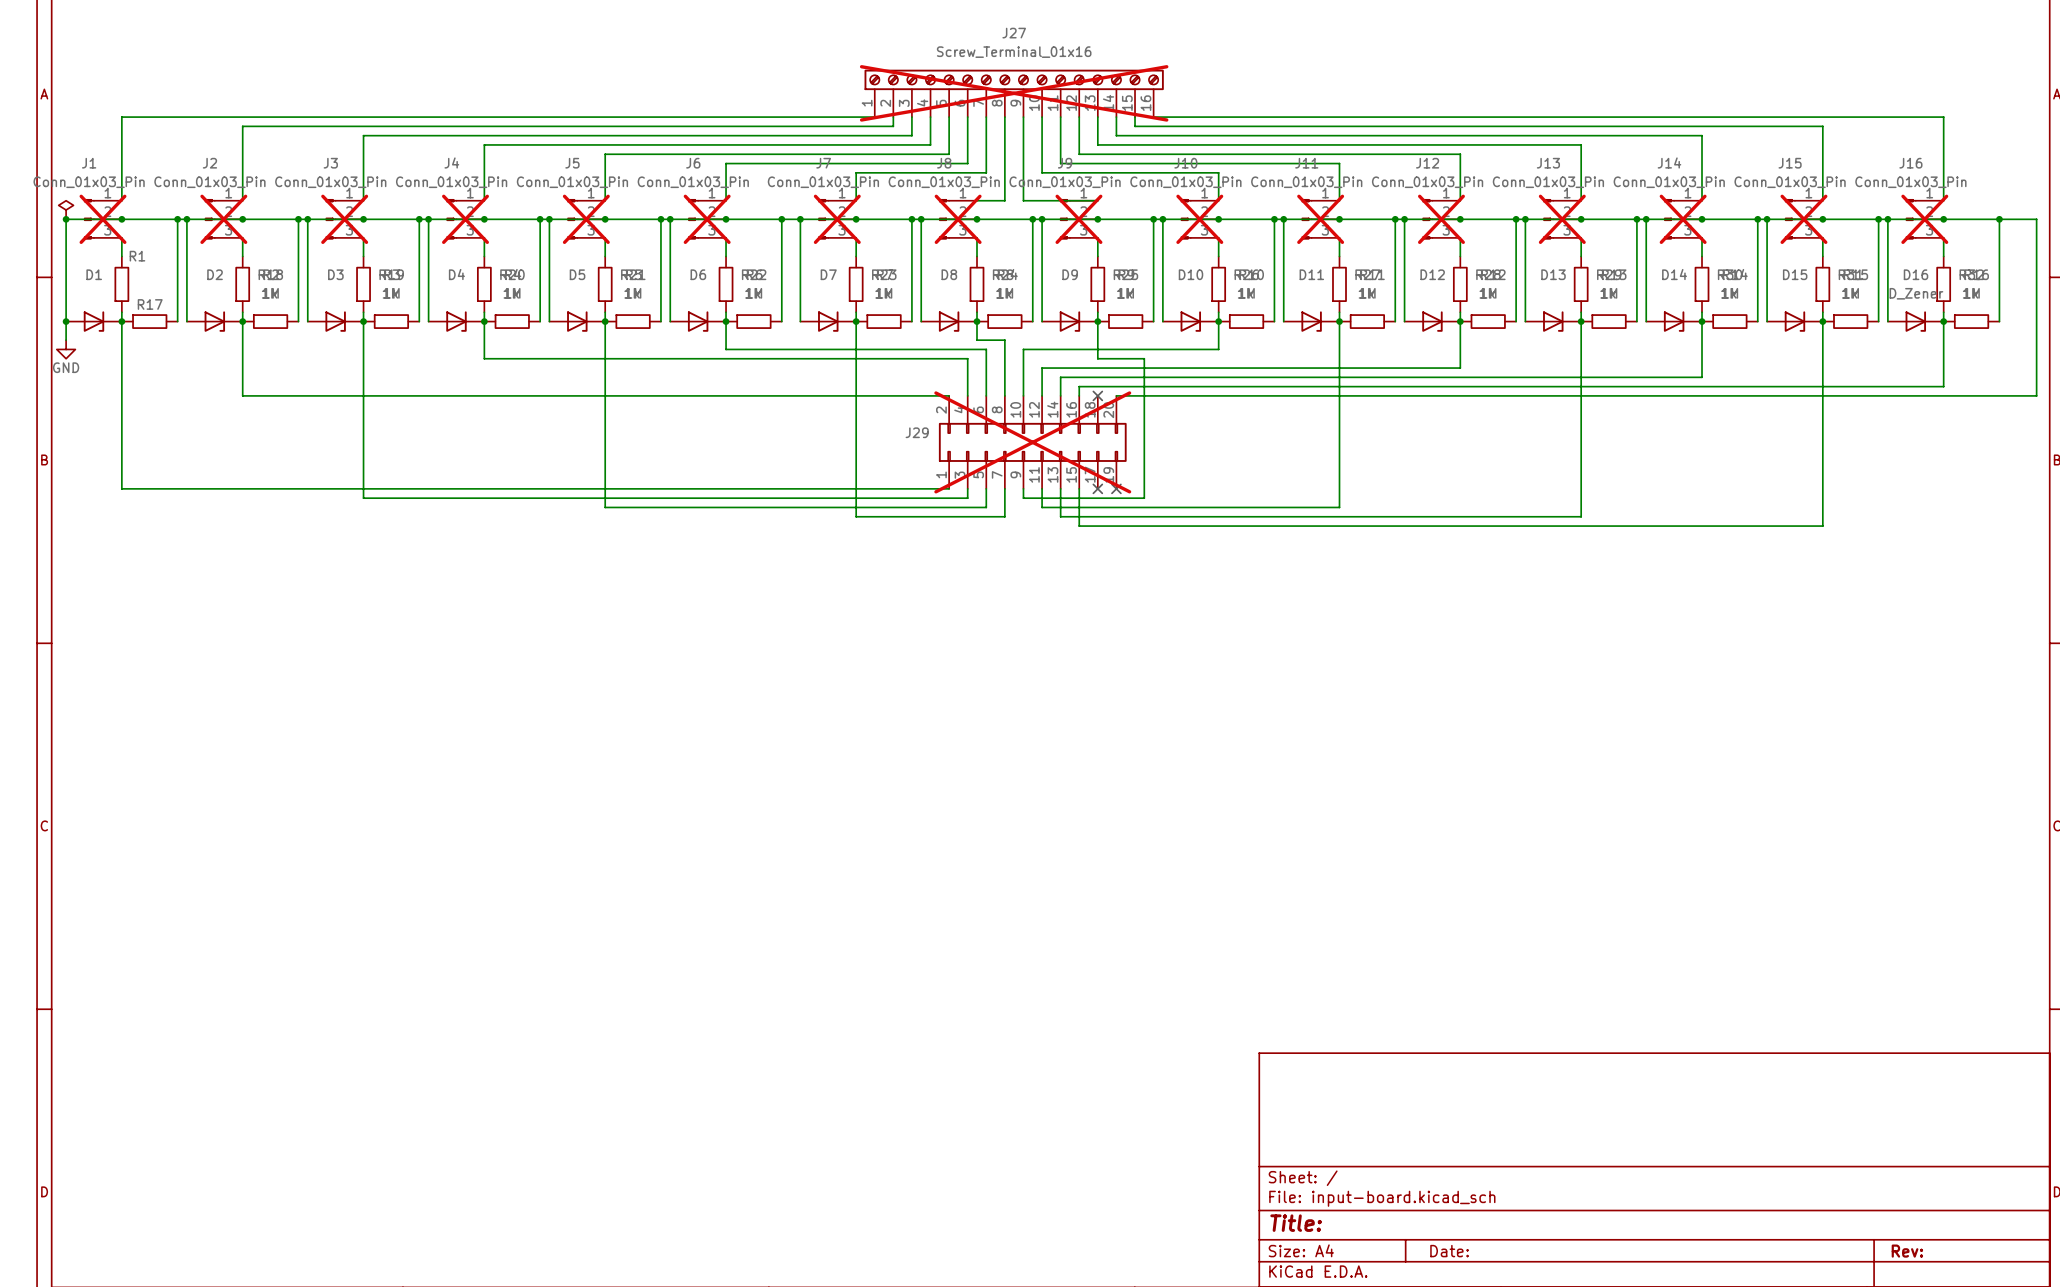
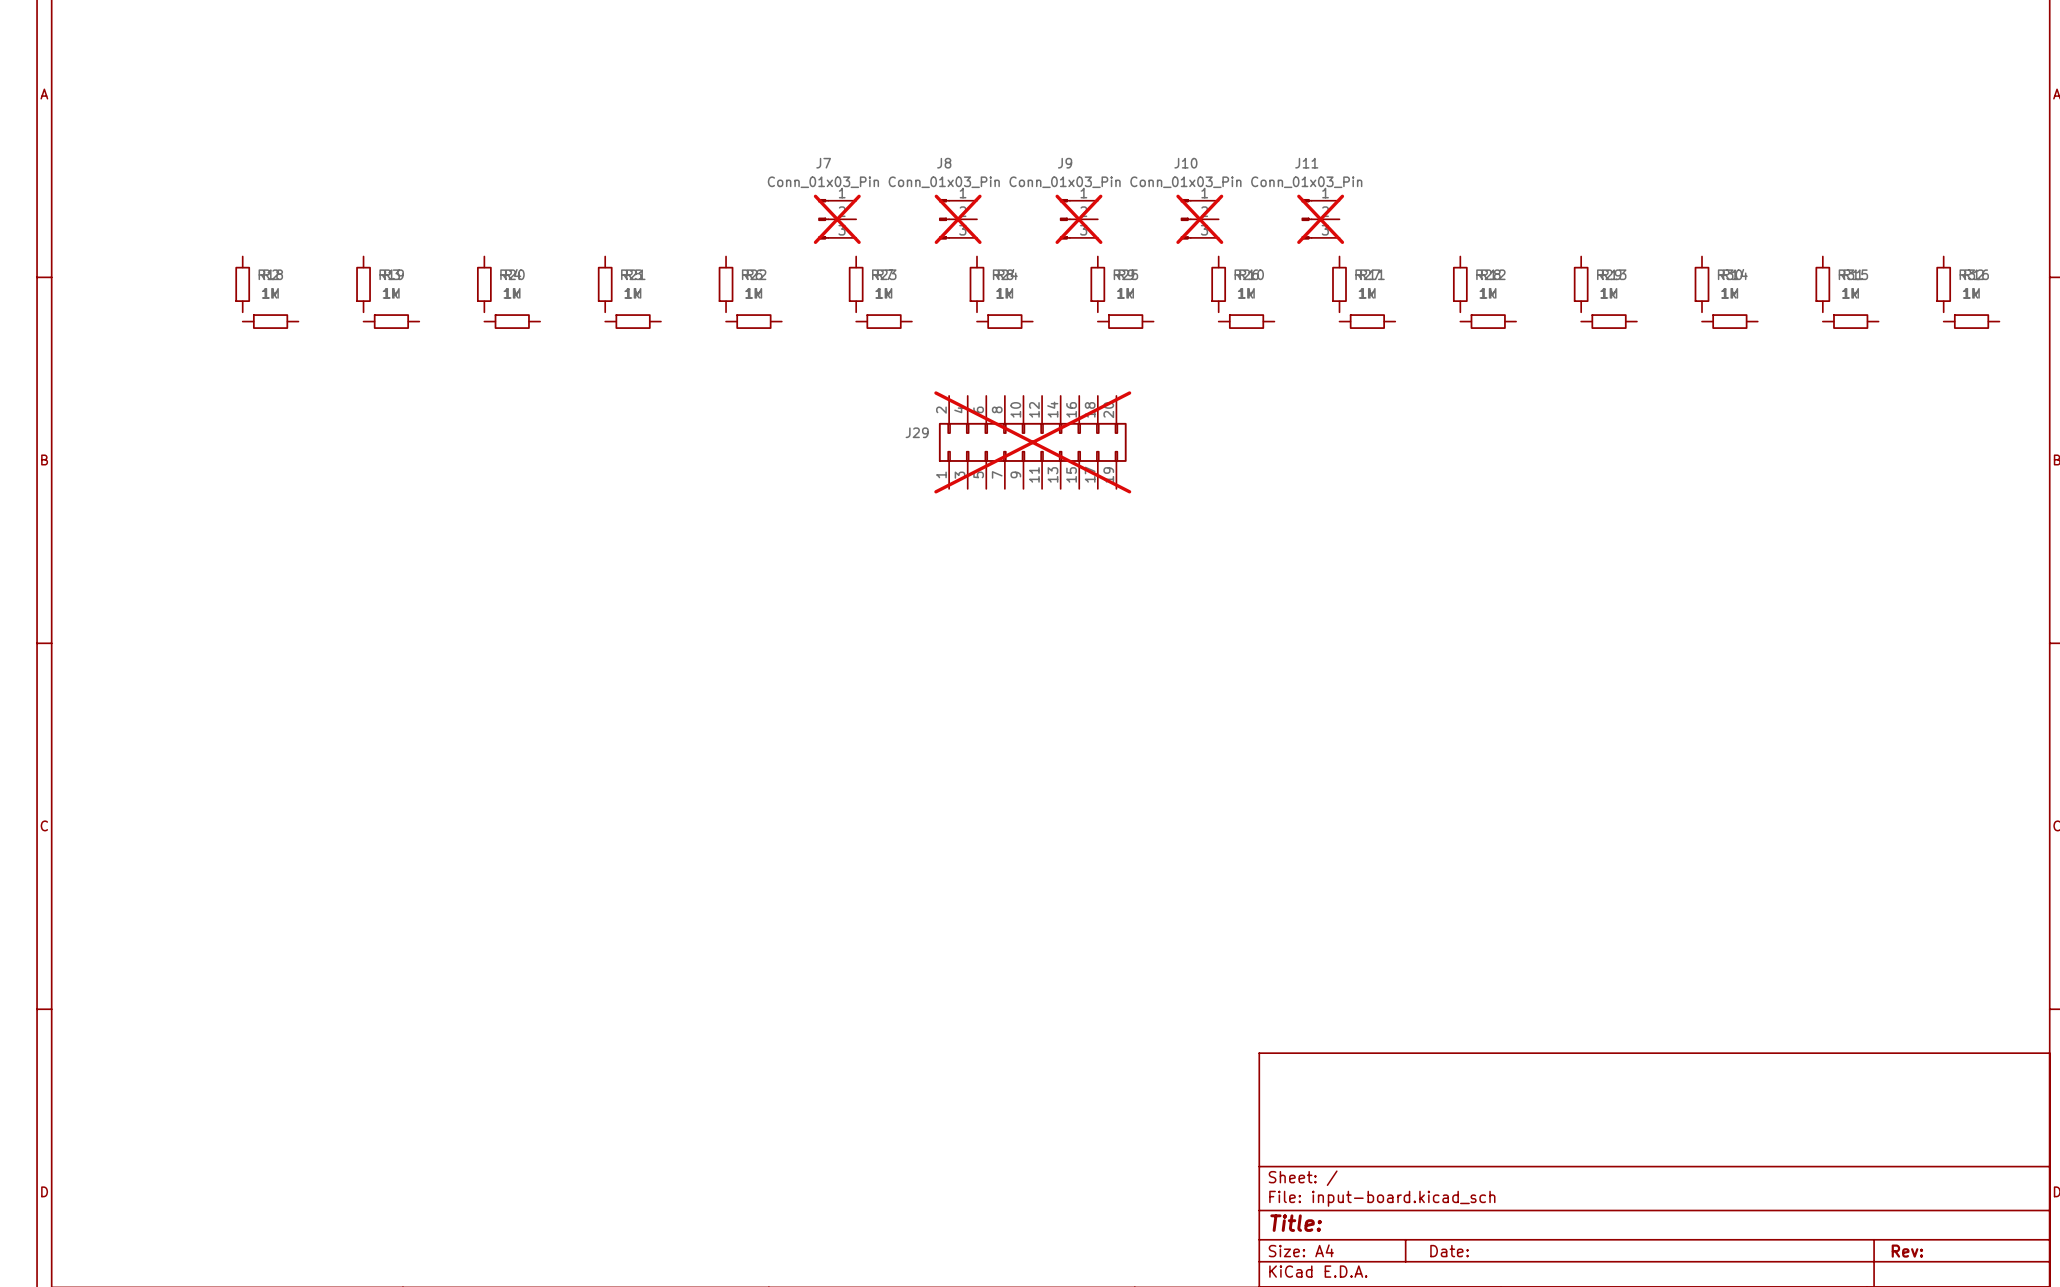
J27: Screw_Terminal_01x16 (1014, 93) -> none
wire: (874, 117) (121, 117) (121, 200) -> none
wire: (893, 117) (893, 126) (242, 126) (242, 200) -> none
wire: (911, 117) (911, 135) (363, 135) (363, 200) -> none
wire: (930, 117) (930, 144) (484, 144) (484, 200) -> none
wire: (949, 117) (949, 154) (605, 154) (605, 200) -> none
wire: (967, 117) (967, 163) (726, 163) (726, 200) -> none
wire: (986, 117) (986, 172) (856, 172) (856, 200) -> none
wire: (1004, 117) (1004, 200) (977, 200) -> none
wire: (1023, 117) (1023, 200) (1097, 200) -> none
wire: (1042, 117) (1042, 172) (1218, 172) (1218, 200) -> none
wire: (1060, 117) (1060, 163) (1339, 163) (1339, 200) -> none
wire: (1079, 117) (1079, 154) (1460, 154) (1460, 200) -> none
wire: (1097, 117) (1097, 144) (1581, 144) (1581, 200) -> none
wire: (1116, 117) (1116, 135) (1702, 135) (1702, 200) -> none
wire: (1135, 117) (1135, 126) (1822, 126) (1822, 200) -> none
wire: (1153, 117) (1943, 117) (1943, 200) -> none
power symbol: (66, 210) -> none
junction: (66, 219) -> none
J1: Conn_01x03_Pin (102, 219) -> none
junction: (121, 219) -> none
wire: (177, 219) (177, 321) -> none
junction: (177, 219) -> none
wire: (186, 219) (186, 321) -> none
junction: (186, 219) -> none
J2: Conn_01x03_Pin (223, 219) -> none
junction: (242, 219) -> none
wire: (298, 219) (298, 321) -> none
junction: (298, 219) -> none
wire: (307, 219) (307, 321) -> none
junction: (307, 219) -> none
J3: Conn_01x03_Pin (344, 219) -> none
junction: (363, 219) -> none
wire: (419, 219) (419, 321) -> none
junction: (419, 219) -> none
wire: (428, 219) (428, 321) -> none
junction: (428, 219) -> none
J4: Conn_01x03_Pin (465, 219) -> none
junction: (484, 219) -> none
wire: (540, 219) (540, 321) -> none
junction: (540, 219) -> none
wire: (549, 219) (549, 321) -> none
junction: (549, 219) -> none
J5: Conn_01x03_Pin (586, 219) -> none
junction: (605, 219) -> none
wire: (660, 219) (660, 321) -> none
junction: (660, 219) -> none
wire: (670, 219) (670, 321) -> none
junction: (670, 219) -> none
J6: Conn_01x03_Pin (707, 219) -> none
junction: (726, 219) -> none
wire: (781, 219) (781, 321) -> none
junction: (781, 219) -> none
wire: (800, 219) (800, 321) -> none
junction: (800, 219) -> none
junction: (856, 219) -> none
wire: (911, 219) (911, 321) -> none
junction: (911, 219) -> none
wire: (921, 219) (921, 321) -> none
junction: (921, 219) -> none
junction: (977, 219) -> none
wire: (1032, 219) (1032, 321) -> none
junction: (1032, 219) -> none
wire: (1042, 219) (1042, 321) -> none
junction: (1042, 219) -> none
junction: (1097, 219) -> none
wire: (1153, 219) (1153, 321) -> none
junction: (1153, 219) -> none
wire: (1162, 219) (1162, 321) -> none
junction: (1162, 219) -> none
junction: (1218, 219) -> none
wire: (1274, 219) (1274, 321) -> none
junction: (1274, 219) -> none
wire: (1283, 219) (1283, 321) -> none
junction: (1283, 219) -> none
junction: (1339, 219) -> none
wire: (1395, 219) (1395, 321) -> none
junction: (1395, 219) -> none
wire: (1404, 219) (1404, 321) -> none
junction: (1404, 219) -> none
J12: Conn_01x03_Pin (1441, 219) -> none
junction: (1460, 219) -> none
wire: (1516, 219) (1516, 321) -> none
junction: (1516, 219) -> none
wire: (1525, 219) (1525, 321) -> none
junction: (1525, 219) -> none
J13: Conn_01x03_Pin (1562, 219) -> none
junction: (1581, 219) -> none
wire: (1636, 219) (1636, 321) -> none
junction: (1636, 219) -> none
wire: (1646, 219) (1646, 321) -> none
junction: (1646, 219) -> none
J14: Conn_01x03_Pin (1683, 219) -> none
junction: (1702, 219) -> none
wire: (1757, 219) (1757, 321) -> none
junction: (1757, 219) -> none
wire: (1767, 219) (1767, 321) -> none
junction: (1767, 219) -> none
J15: Conn_01x03_Pin (1803, 219) -> none
junction: (1822, 219) -> none
wire: (1878, 219) (1878, 321) -> none
junction: (1878, 219) -> none
wire: (1887, 219) (1887, 321) -> none
junction: (1887, 219) -> none
J16: Conn_01x03_Pin (1924, 219) -> none
junction: (1943, 219) -> none
wire: (1999, 219) (1999, 321) -> none
junction: (1999, 219) -> none
wire: (121, 237) (121, 256) -> none
wire: (242, 237) (242, 256) -> none
wire: (363, 237) (363, 256) -> none
wire: (484, 237) (484, 256) -> none
wire: (605, 237) (605, 256) -> none
wire: (726, 237) (726, 256) -> none
wire: (856, 237) (856, 256) -> none
wire: (977, 237) (977, 256) -> none
wire: (1097, 237) (1097, 256) -> none
wire: (1218, 237) (1218, 256) -> none
wire: (1339, 237) (1339, 256) -> none
wire: (1460, 237) (1460, 256) -> none
wire: (1581, 237) (1581, 256) -> none
wire: (1702, 237) (1702, 256) -> none
wire: (1822, 237) (1822, 256) -> none
wire: (1943, 237) (1943, 256) -> none
R1: (121, 284) -> none
wire: (121, 312) (121, 488) (949, 488) -> none
wire: (242, 312) (242, 395) (949, 395) -> none
wire: (363, 312) (363, 498) (967, 498) (967, 488) -> none
wire: (484, 312) (484, 358) (967, 358) (967, 395) -> none
wire: (605, 312) (605, 507) (986, 507) (986, 488) -> none
wire: (726, 312) (726, 349) (986, 349) (986, 395) -> none
wire: (856, 312) (856, 516) (1004, 516) (1004, 488) -> none
wire: (977, 312) (977, 340) (1004, 340) (1004, 395) -> none
wire: (1097, 312) (1097, 358) (1144, 358) (1144, 498) (1023, 498) (1023, 488) -> none
wire: (1218, 312) (1218, 349) (1023, 349) (1023, 395) -> none
wire: (1339, 312) (1339, 507) (1042, 507) (1042, 488) -> none
wire: (1460, 312) (1460, 368) (1042, 368) (1042, 395) -> none
wire: (1581, 312) (1581, 516) (1060, 516) (1060, 488) -> none
wire: (1702, 312) (1702, 377) (1060, 377) (1060, 395) -> none
wire: (1822, 312) (1822, 526) (1079, 526) (1079, 488) -> none
wire: (1943, 312) (1943, 386) (1079, 386) (1079, 395) -> none
junction: (66, 321) -> none
D1: (93, 321) -> none
junction: (121, 321) -> none
R17: (149, 321) -> none
D2: (214, 321) -> none
junction: (242, 321) -> none
D3: (335, 321) -> none
junction: (363, 321) -> none
D4: (456, 321) -> none
junction: (484, 321) -> none
D5: (577, 321) -> none
junction: (605, 321) -> none
D6: (698, 321) -> none
junction: (726, 321) -> none
D7: (828, 321) -> none
junction: (856, 321) -> none
D8: (949, 321) -> none
junction: (977, 321) -> none
D9: (1069, 321) -> none
junction: (1097, 321) -> none
D10: (1190, 321) -> none
junction: (1218, 321) -> none
D11: (1311, 321) -> none
junction: (1339, 321) -> none
D12: (1432, 321) -> none
junction: (1460, 321) -> none
D13: (1553, 321) -> none
junction: (1581, 321) -> none
D14: (1674, 321) -> none
junction: (1702, 321) -> none
D15: (1794, 321) -> none
junction: (1822, 321) -> none
D16: D_Zener (1915, 321) -> none
junction: (1943, 321) -> none
wire: (66, 340) (66, 219) (2036, 219) (2036, 395) (1116, 395) -> none
power symbol: GND (66, 349) -> none
no-connect mark: (1097, 395) -> none
no-connect mark: (1097, 488) -> none
no-connect mark: (1116, 488) -> none

